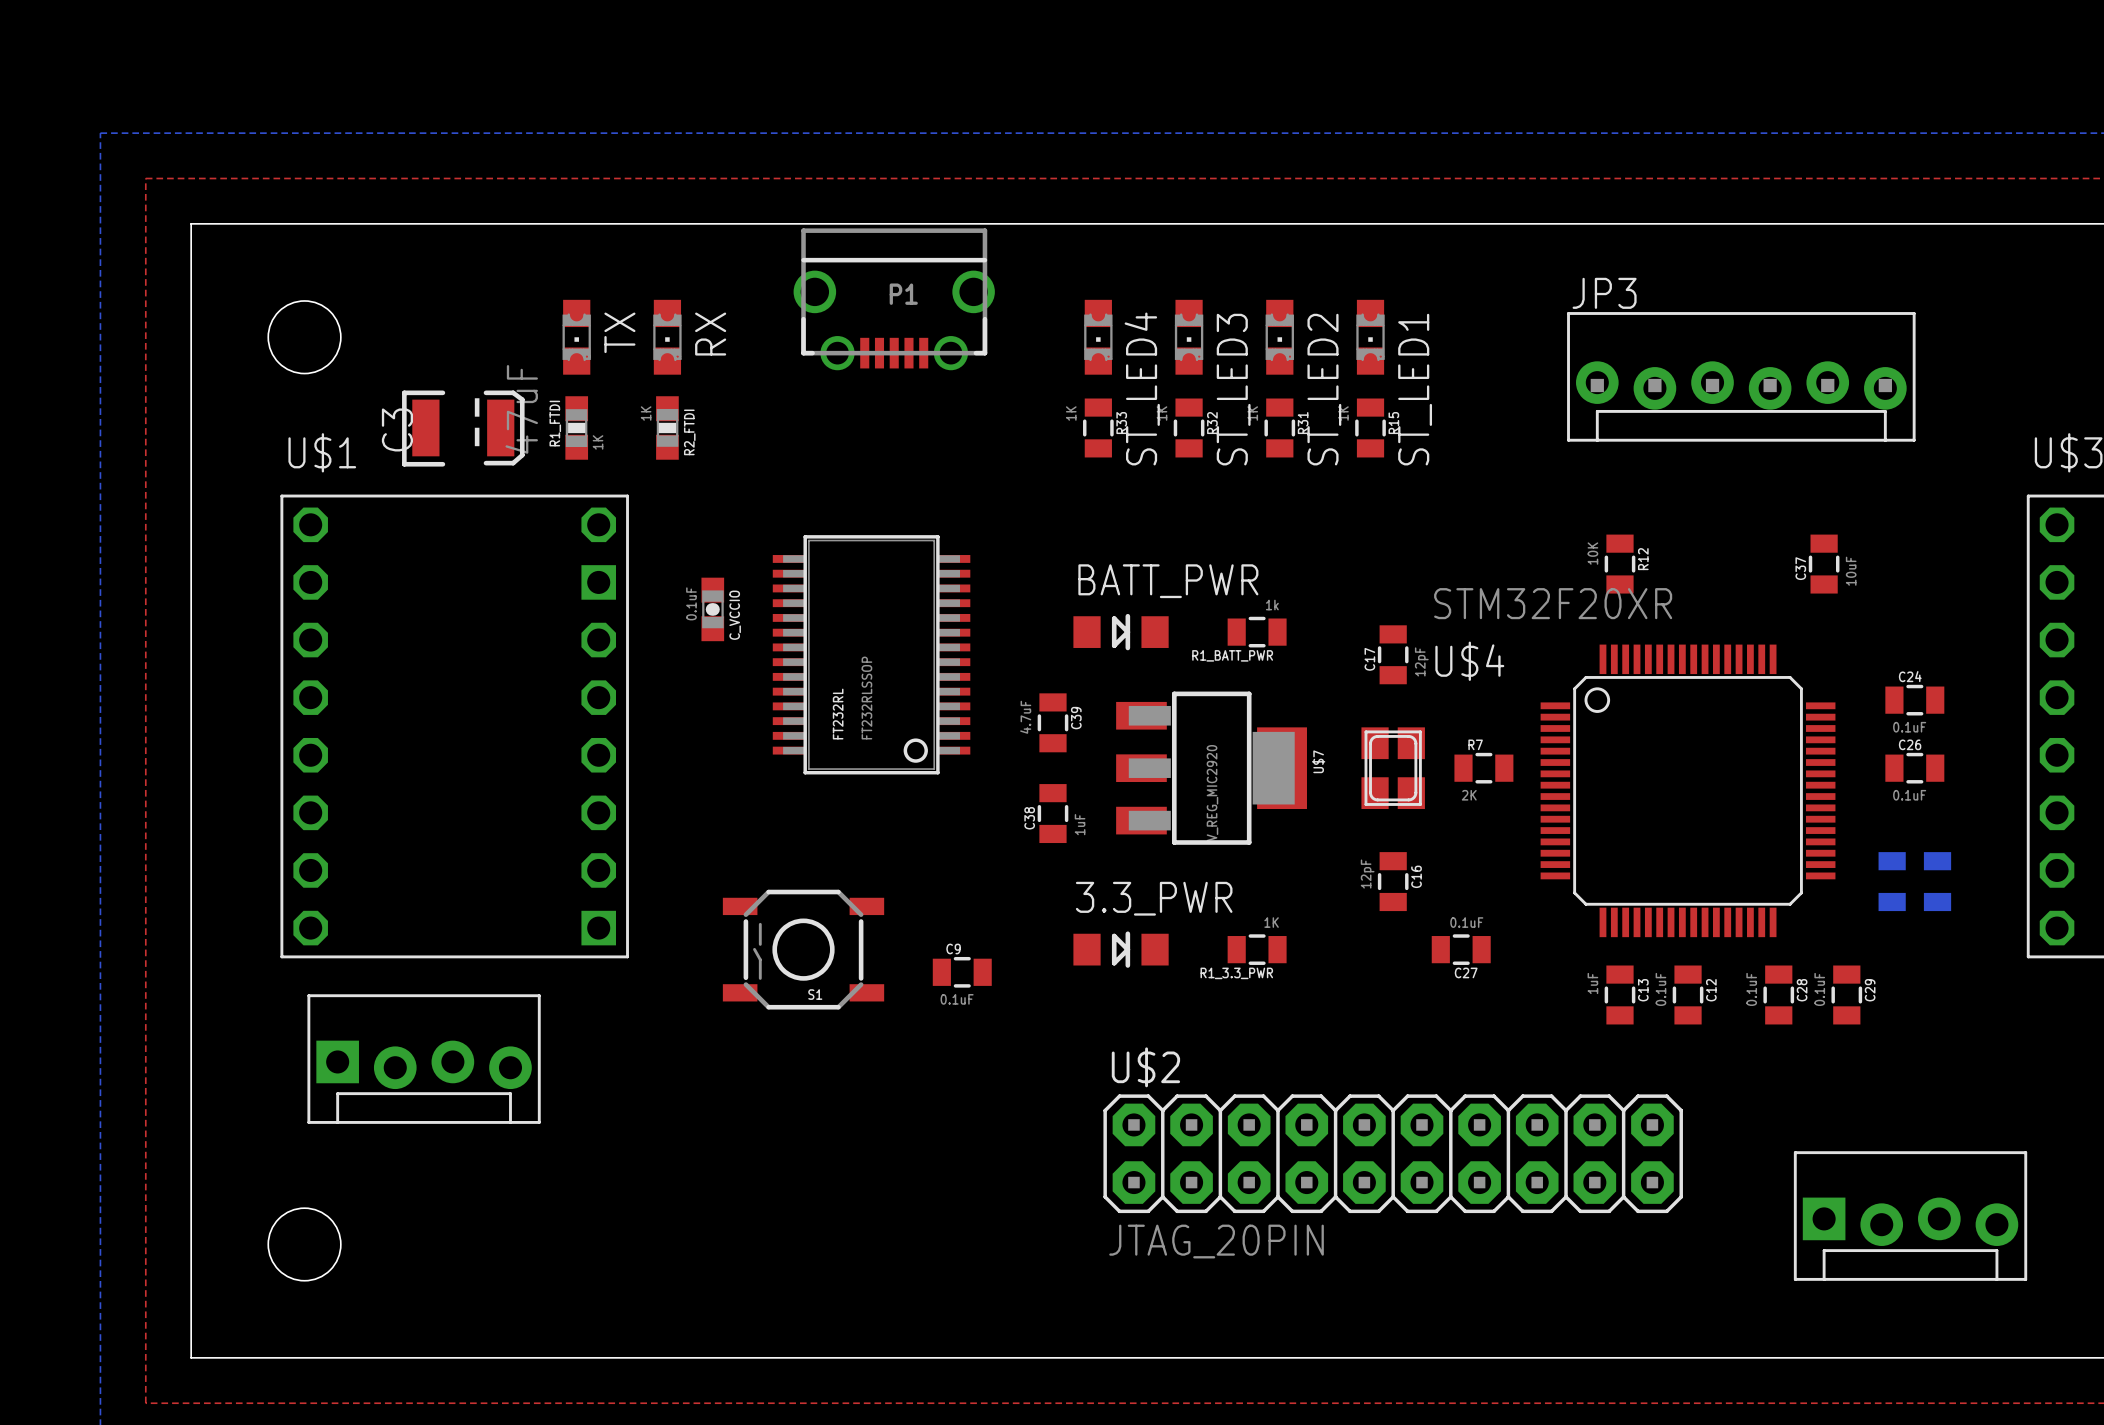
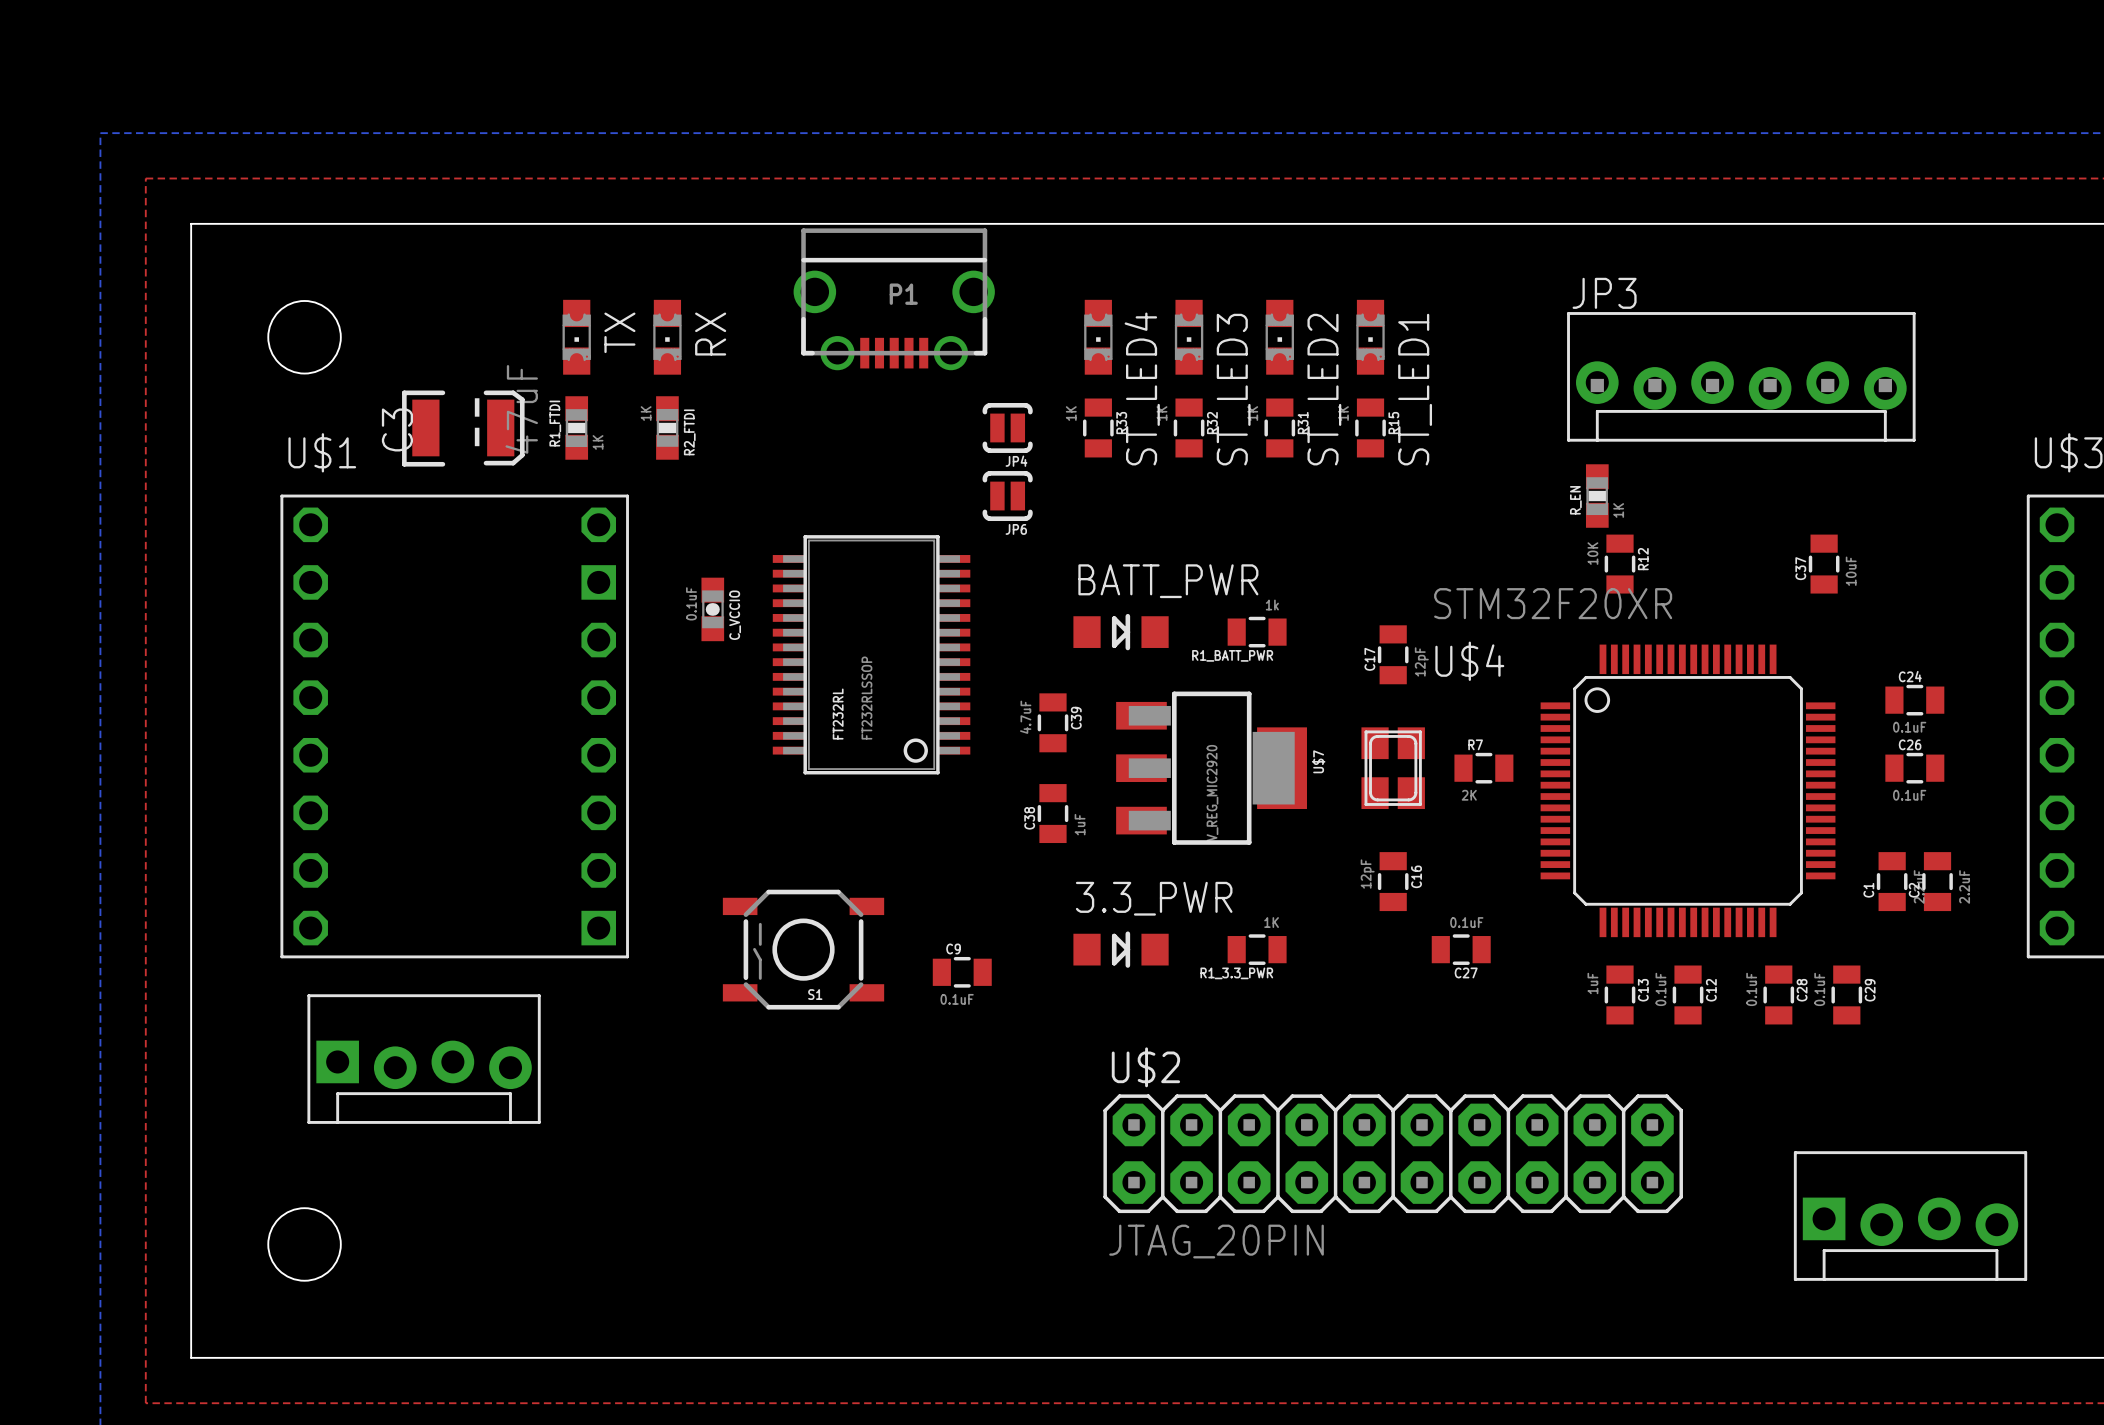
JP4: none -> (1007, 427)
JP6: none -> (1007, 496)
R_EN: none -> 1K (1597, 496)
C1 side: bottom (1892, 881) -> top (1892, 881)
C2 side: bottom (1937, 881) -> top (1937, 881)

